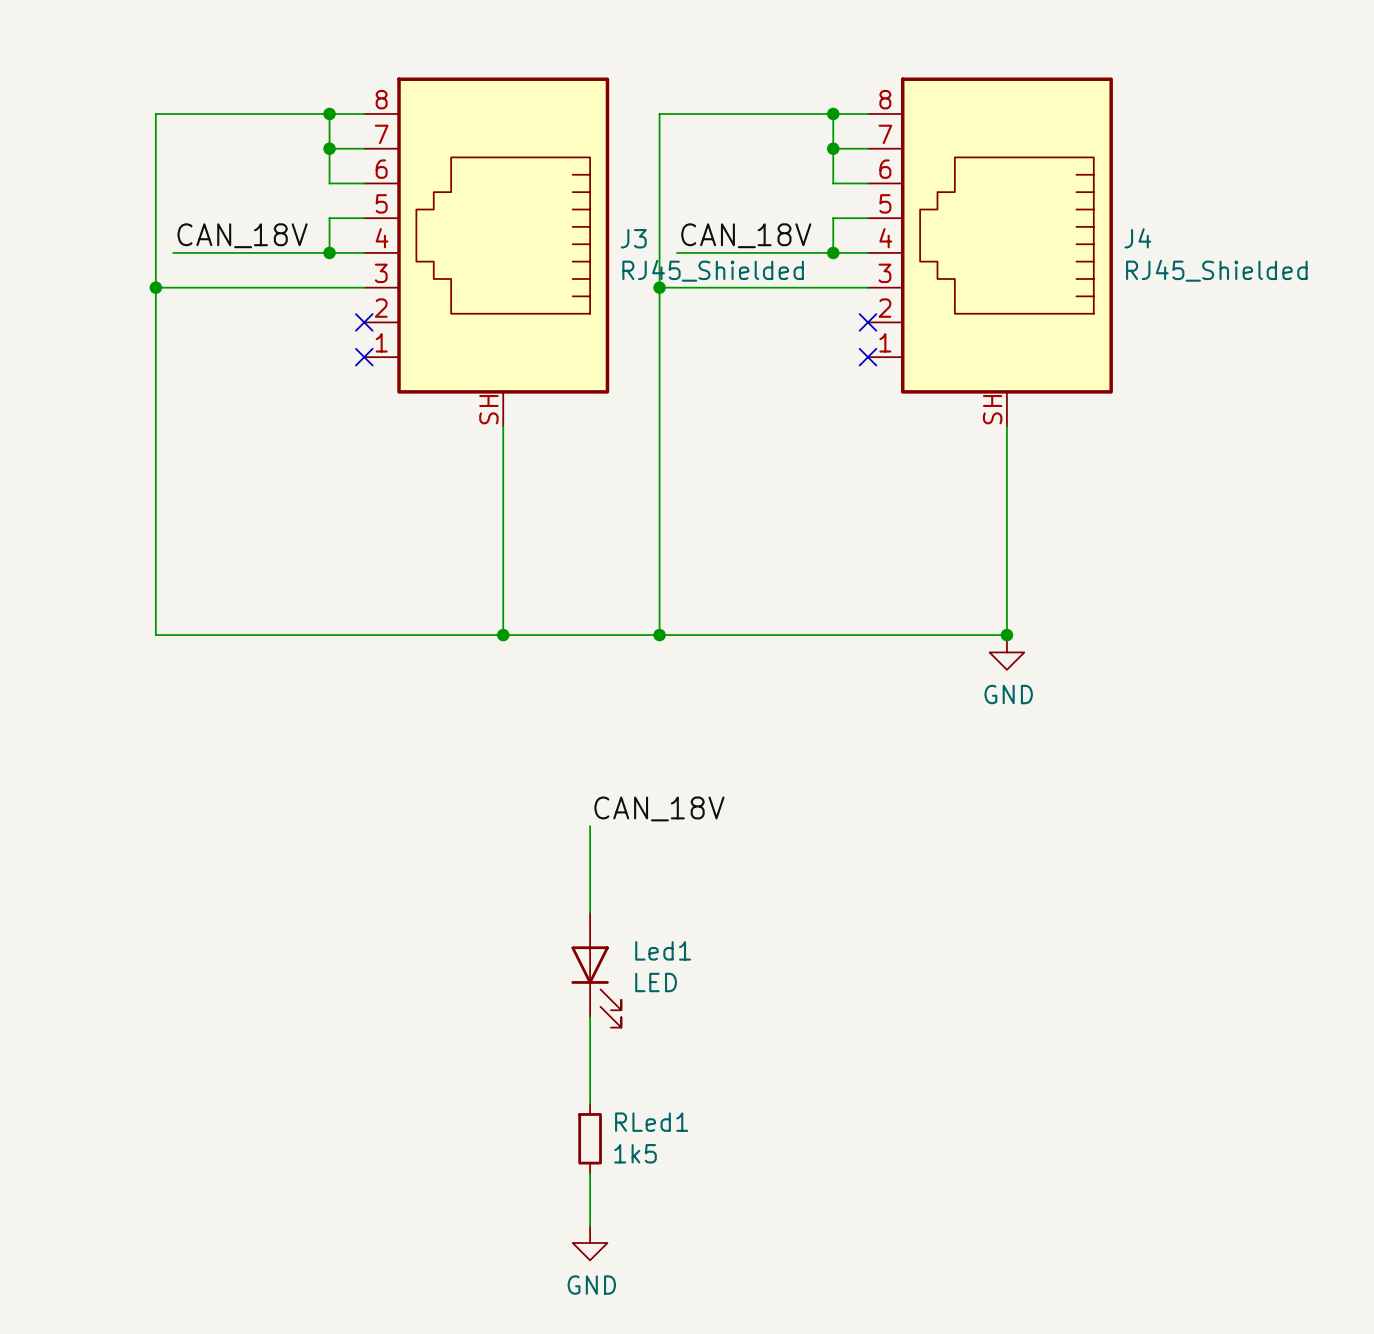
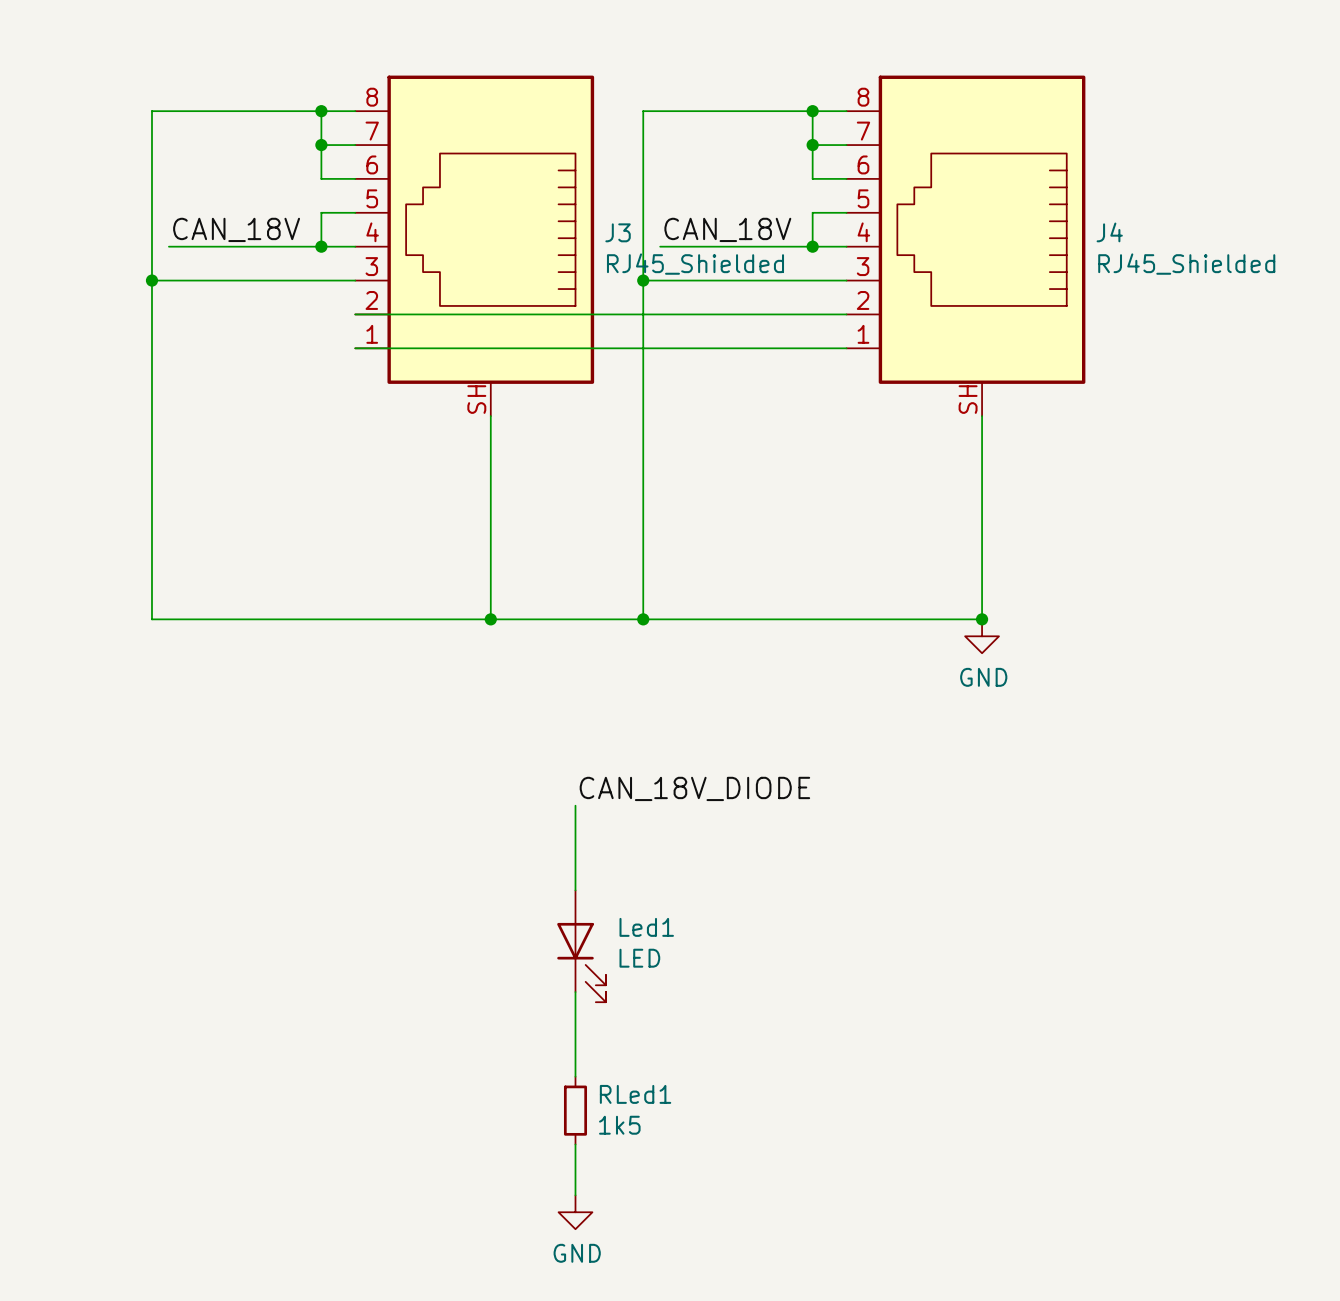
wire: none -> (355, 314) (846, 314)
no-connect mark: (364, 322) -> none
no-connect mark: (867, 322) -> none
wire: none -> (355, 348) (846, 348)
no-connect mark: (364, 357) -> none
no-connect mark: (867, 357) -> none
label: CAN_18V (659, 808) -> CAN_18V_DIODE (694, 788)

